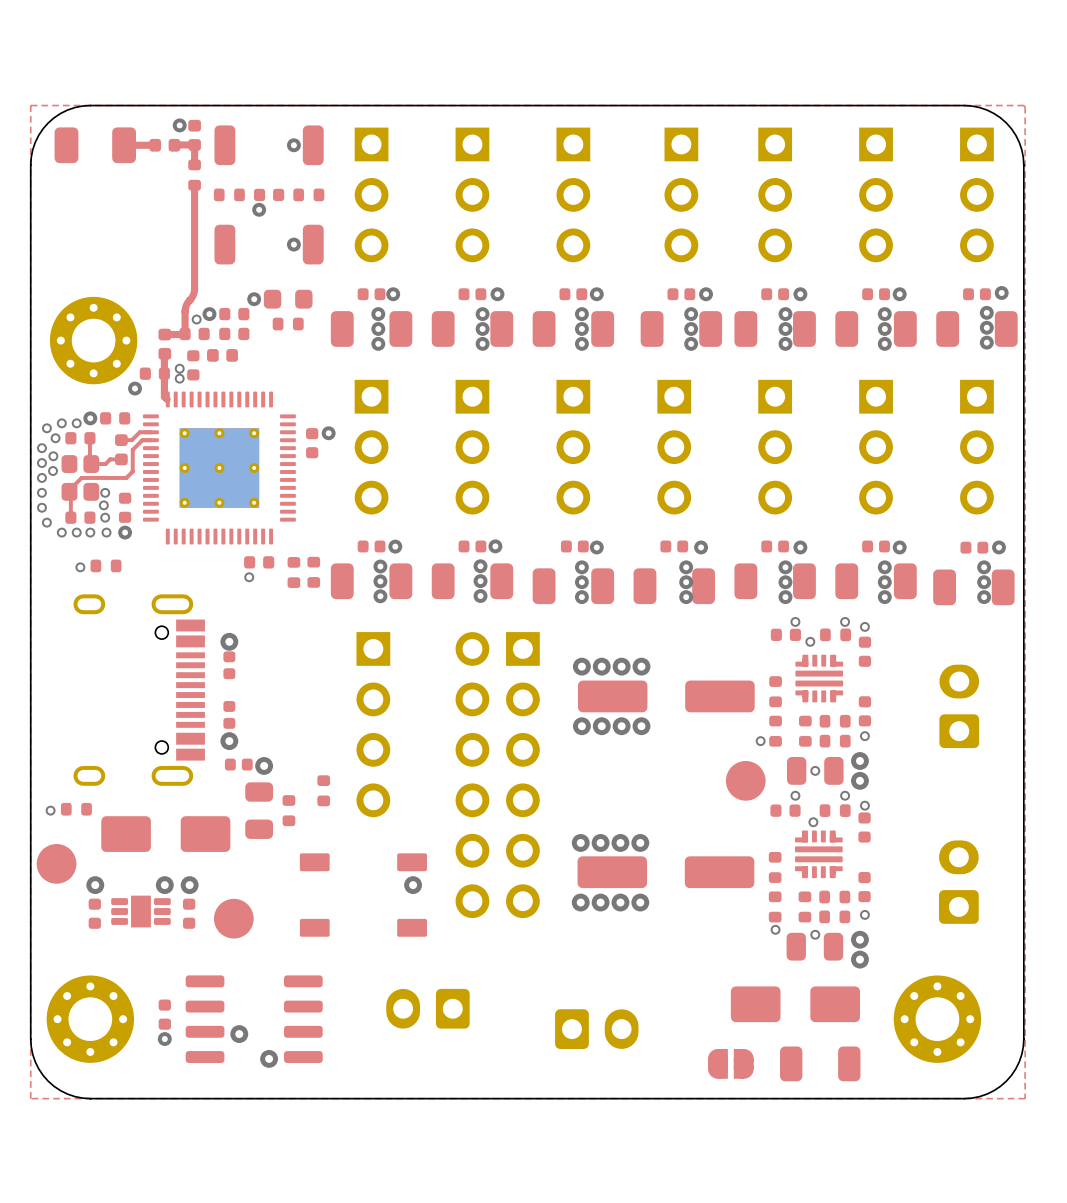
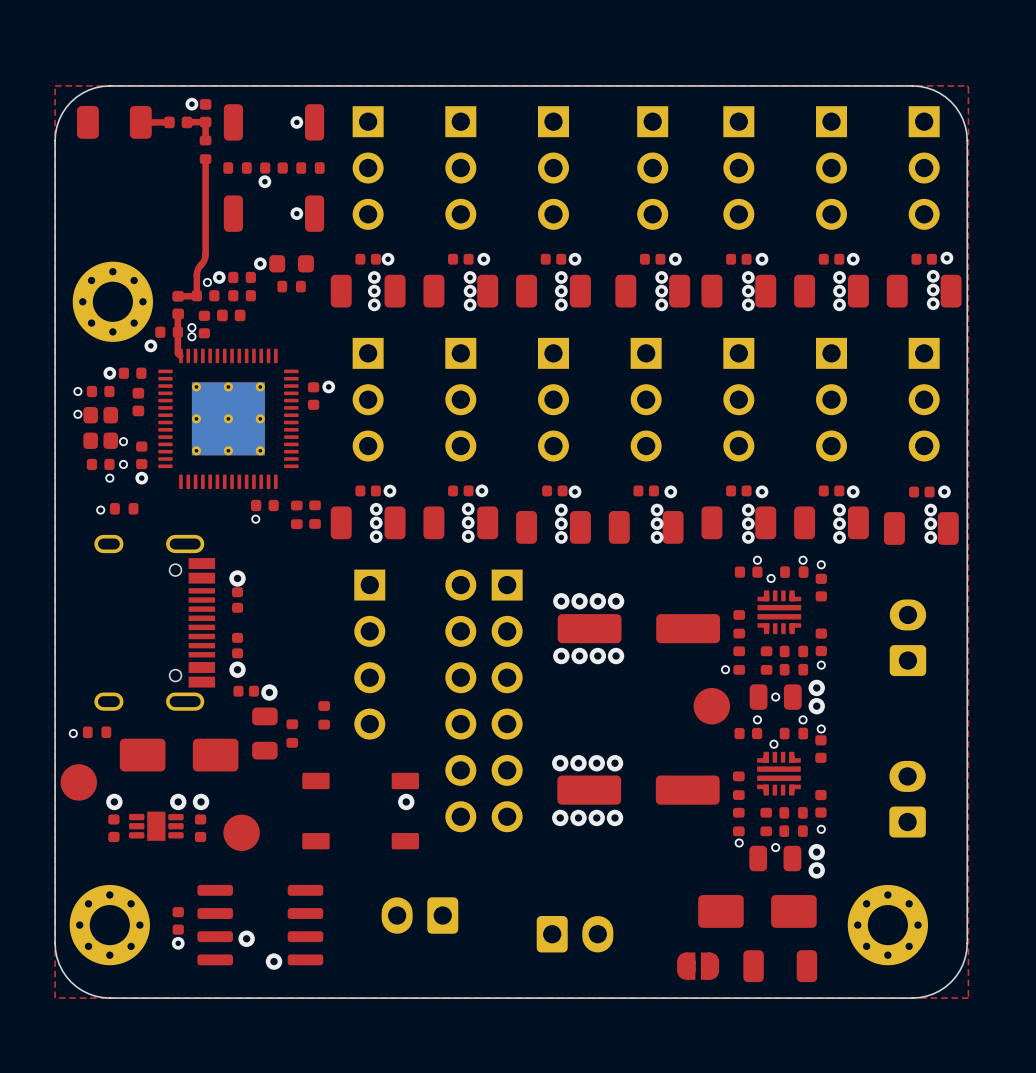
via: (61, 423) -> none
via: (76, 423) -> none
via: (46, 428) -> none
top track: (150, 432) (139, 432) (131, 440) (121, 440) -> none
top track: (89, 438) (91, 464) (105, 464) (110, 459) (121, 459) -> none
top track: (150, 440) (142, 440) (132, 449) (132, 471) (126, 477) (81, 477) (69, 490) (70, 517) -> none
via: (41, 448) -> none
via: (53, 456) -> none
via: (41, 463) -> none
via: none -> (77, 414)
via: (53, 471) -> none
via: (41, 477) -> none
via: (41, 492) -> none
via: (103, 505) -> none
via: (41, 507) -> none
via: (46, 522) -> none
via: (61, 532) -> none
via: (76, 532) -> none
via: (106, 532) -> none

